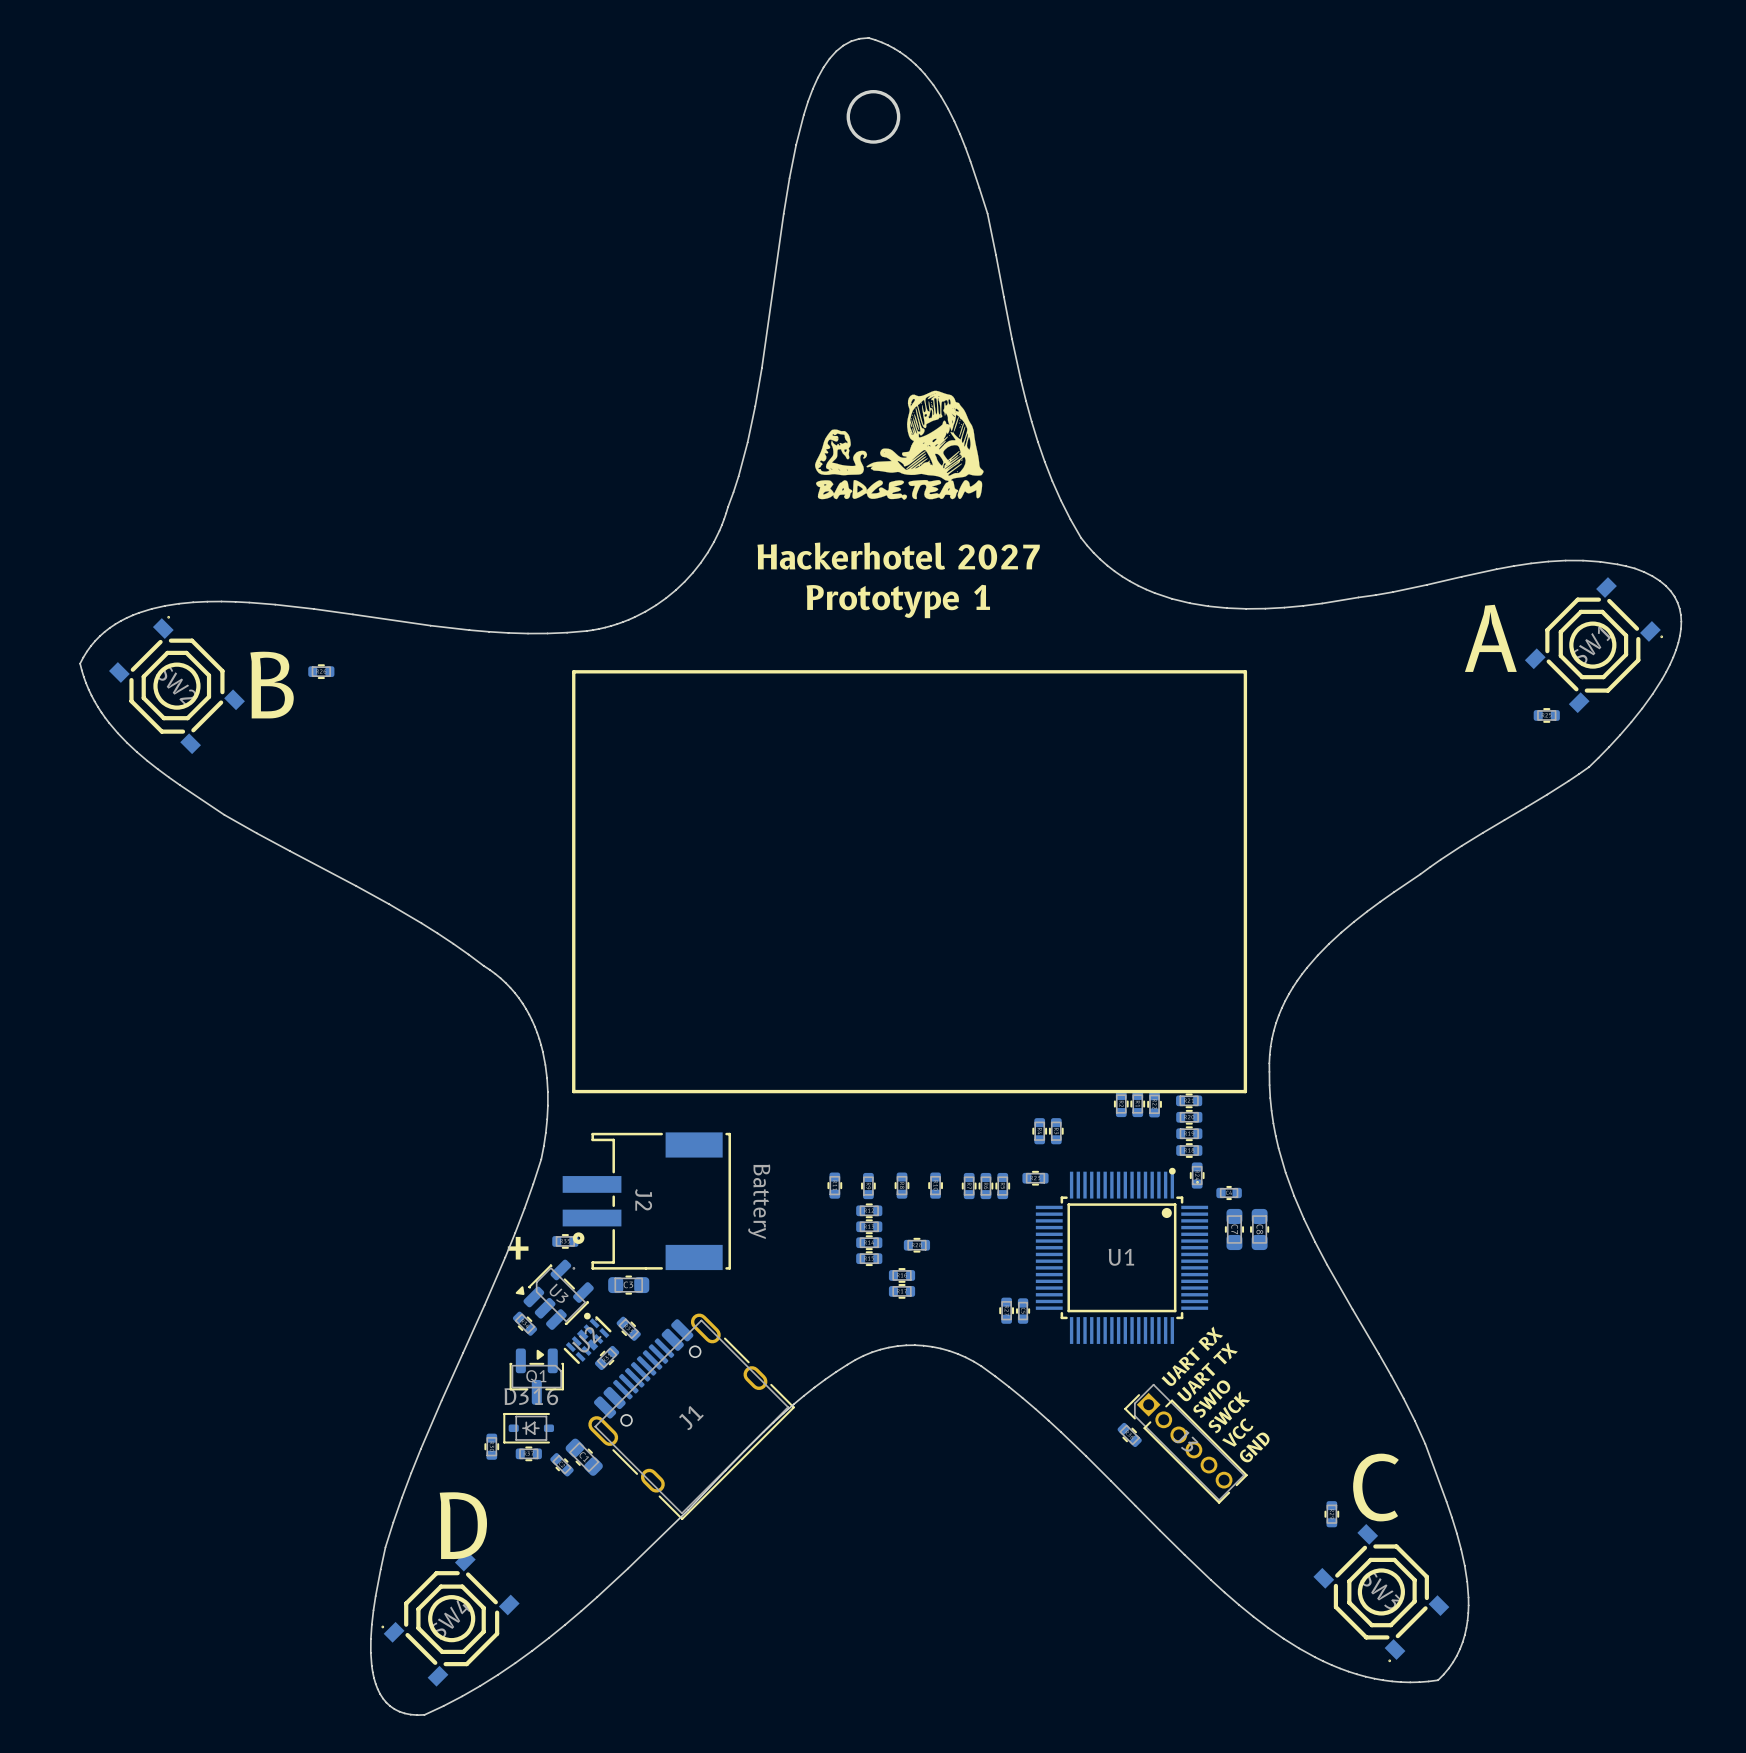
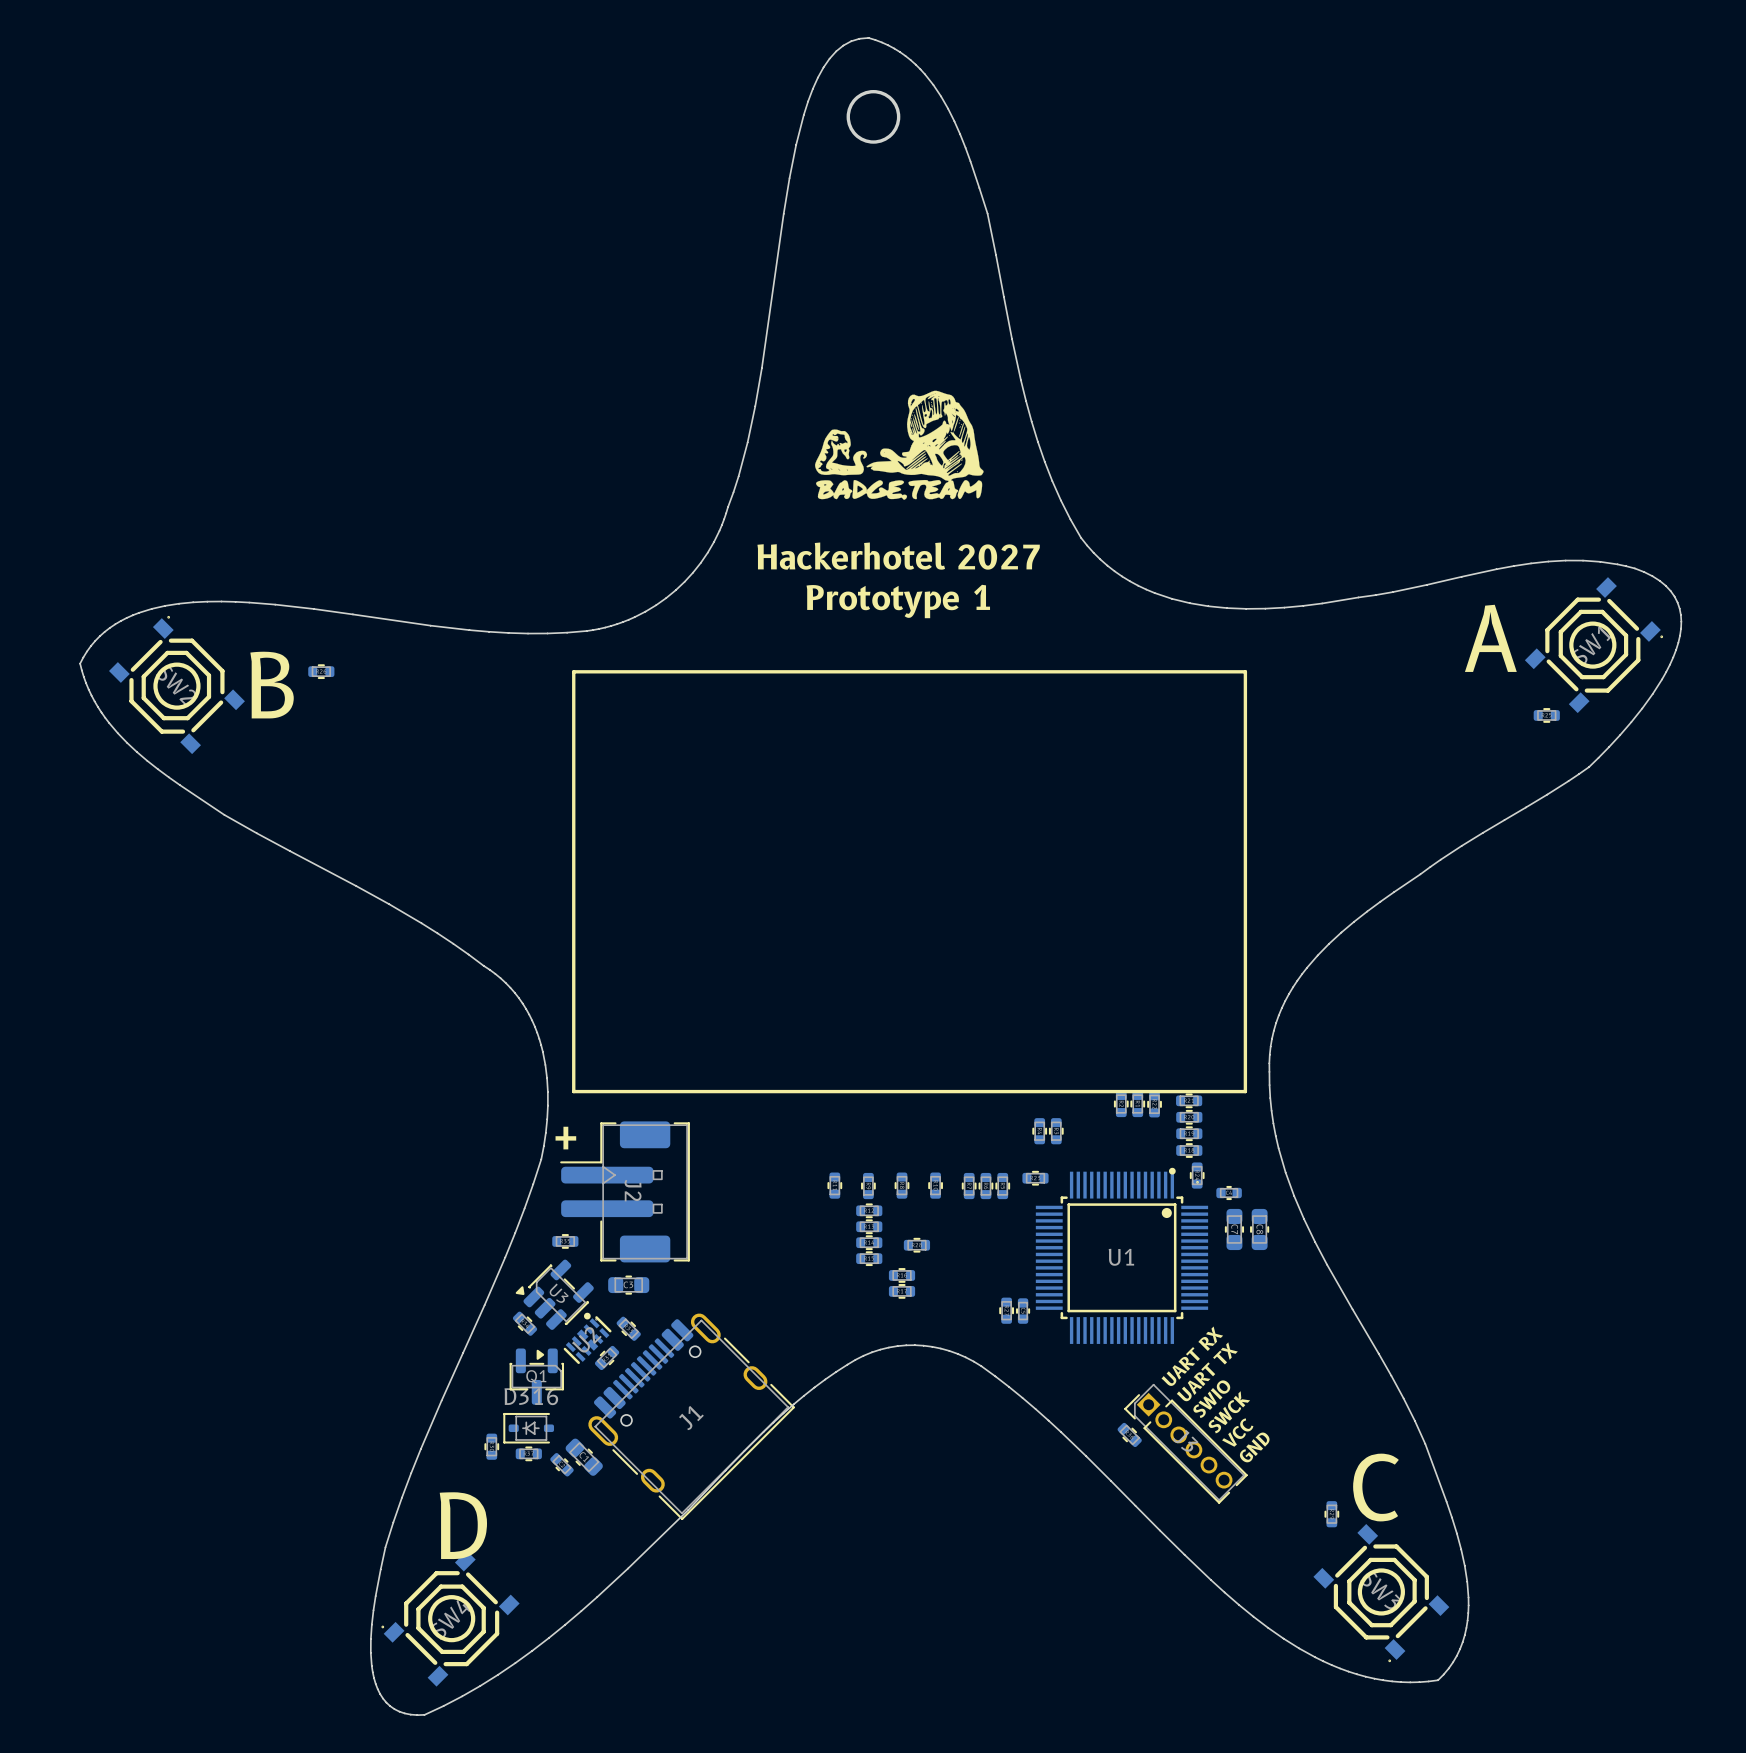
J2 footprint: [562, 1132, 731, 1271] -> [560, 1121, 690, 1263]
J2 value: Battery (759, 1201) -> none
text position: + (518, 1248) -> + (565, 1138)

